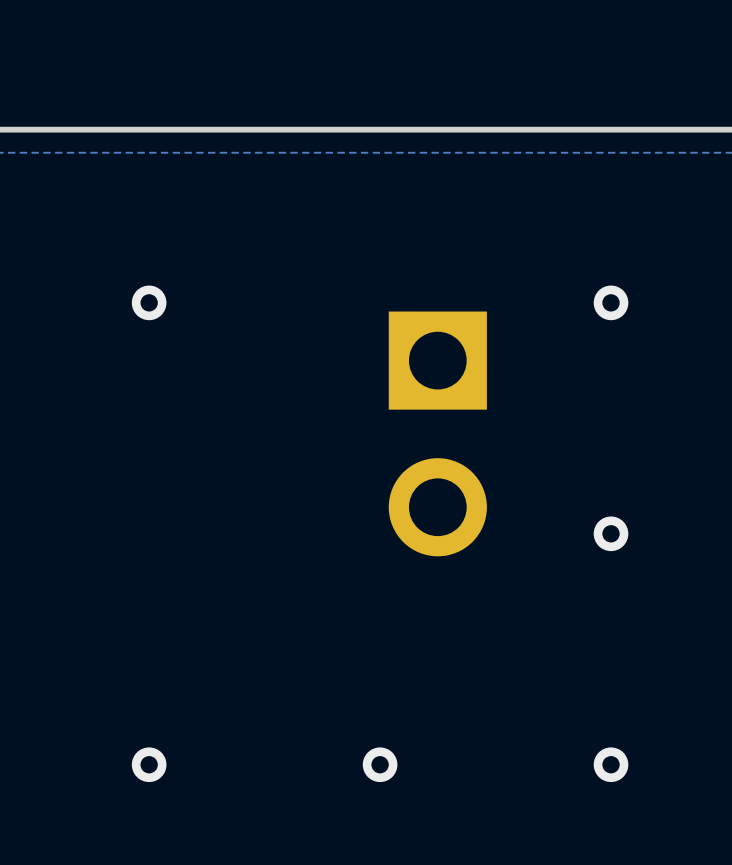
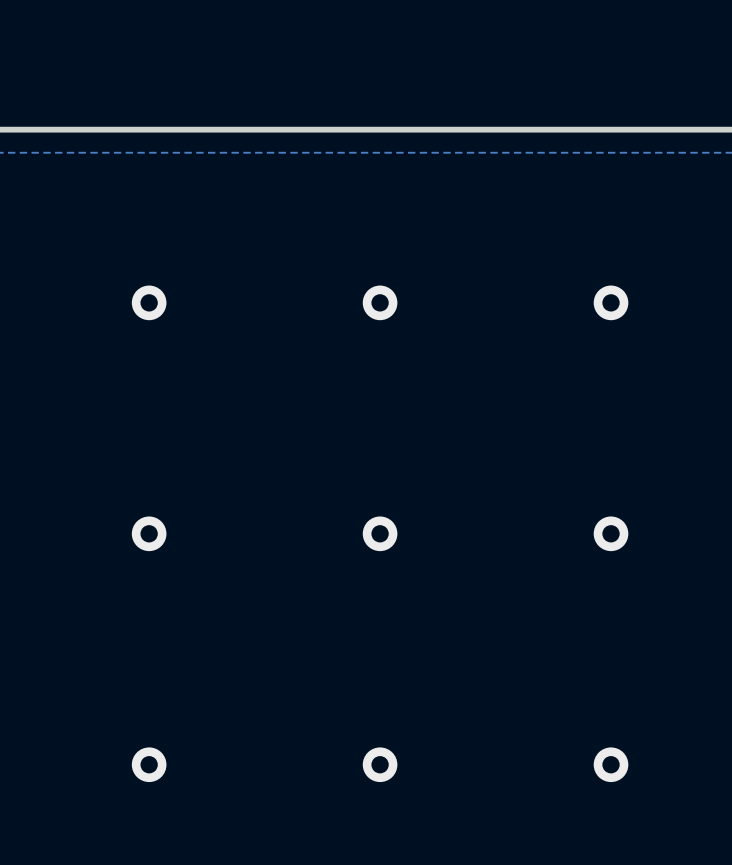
via: none -> (380, 302)
part: (437, 433) -> none
via: none -> (149, 533)
via: none -> (380, 533)

